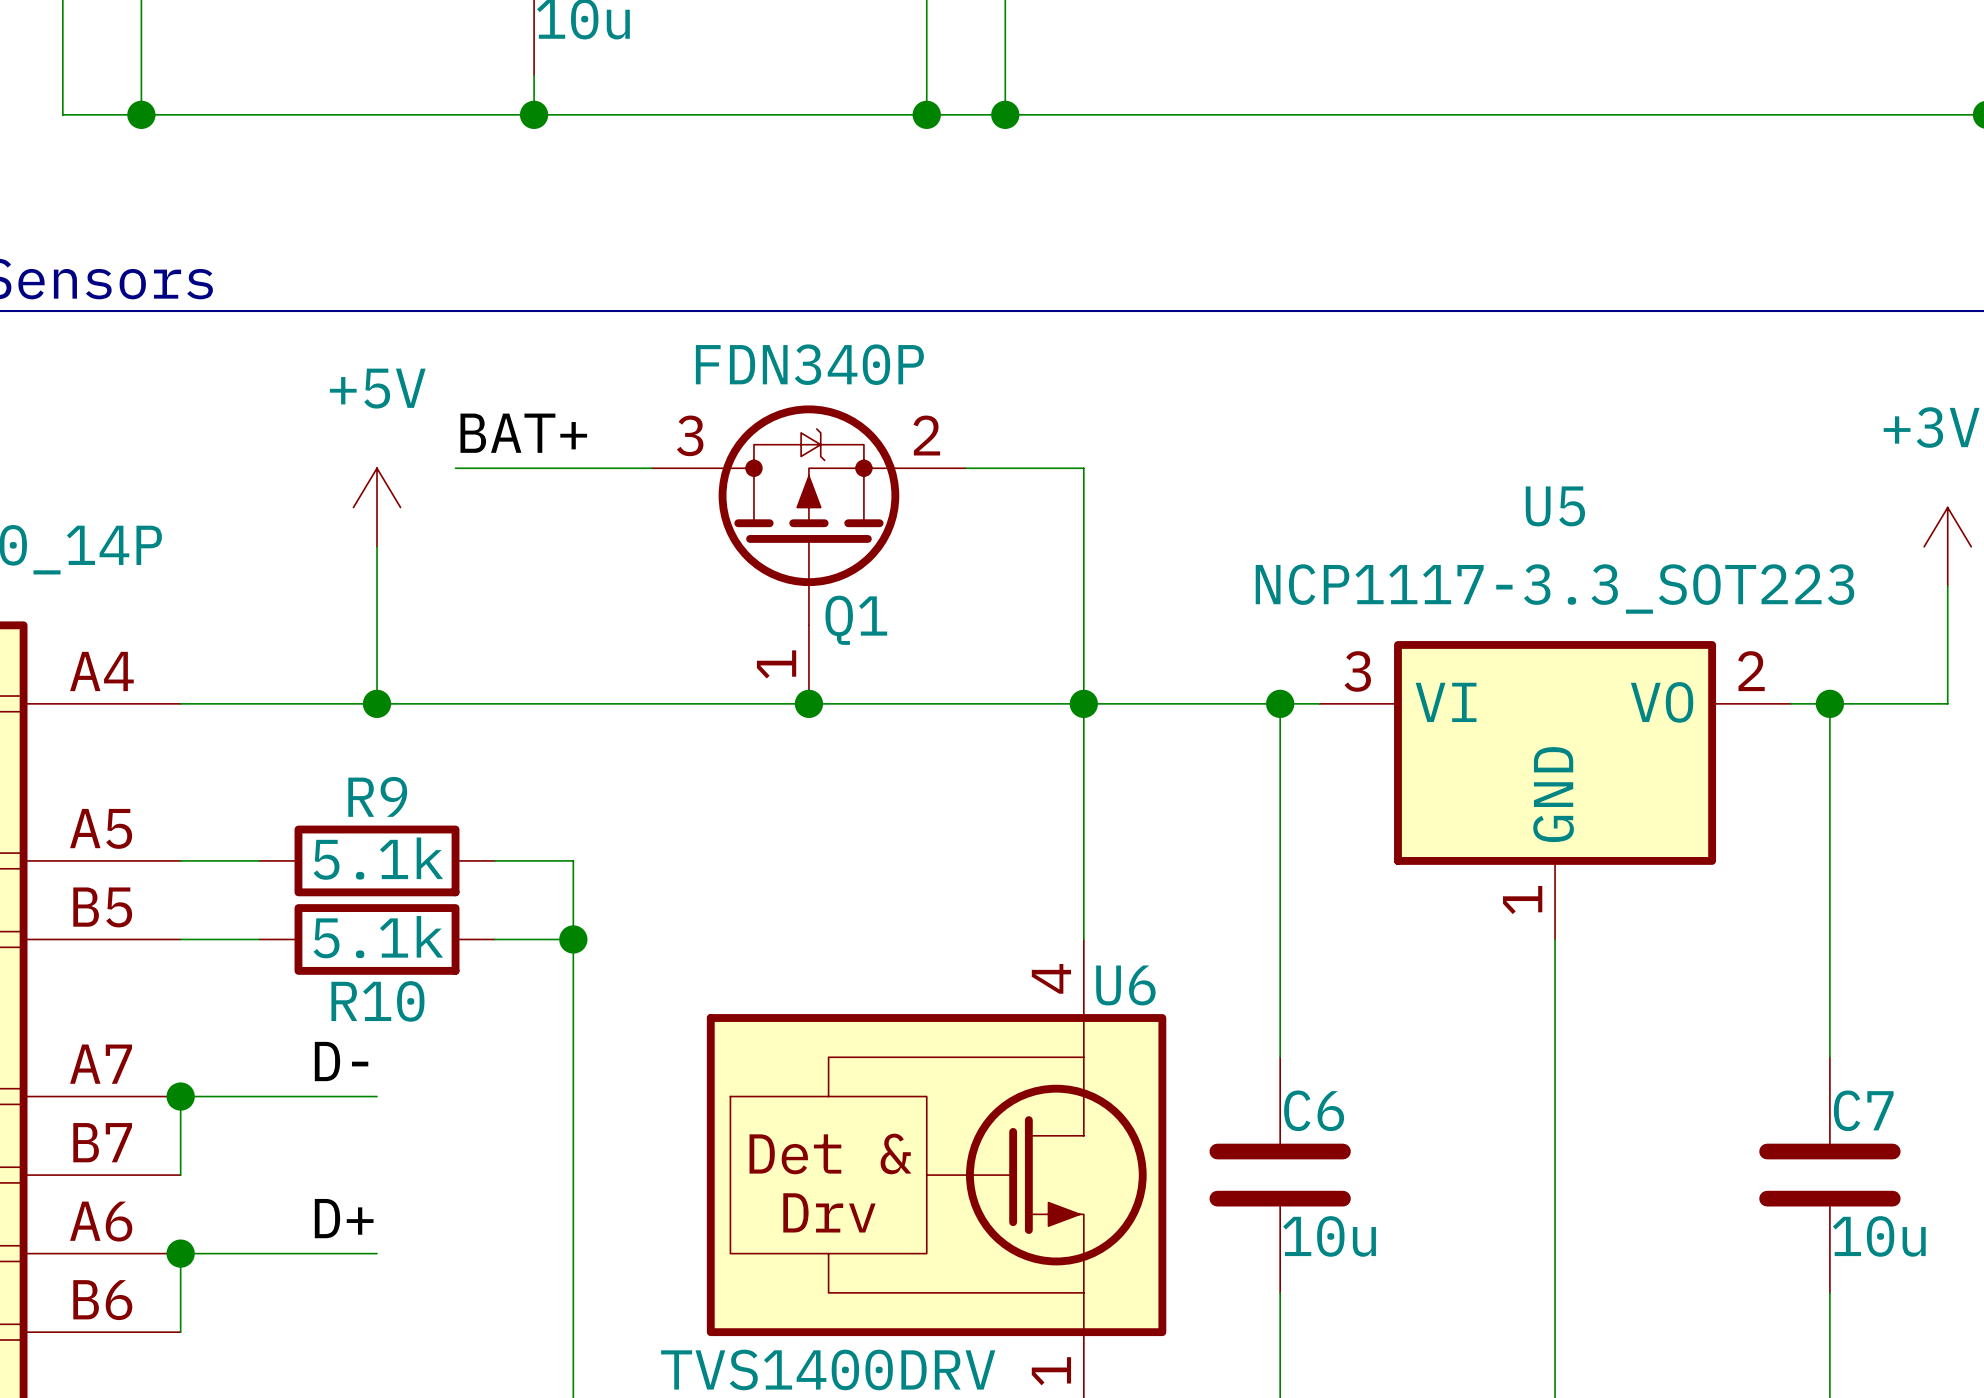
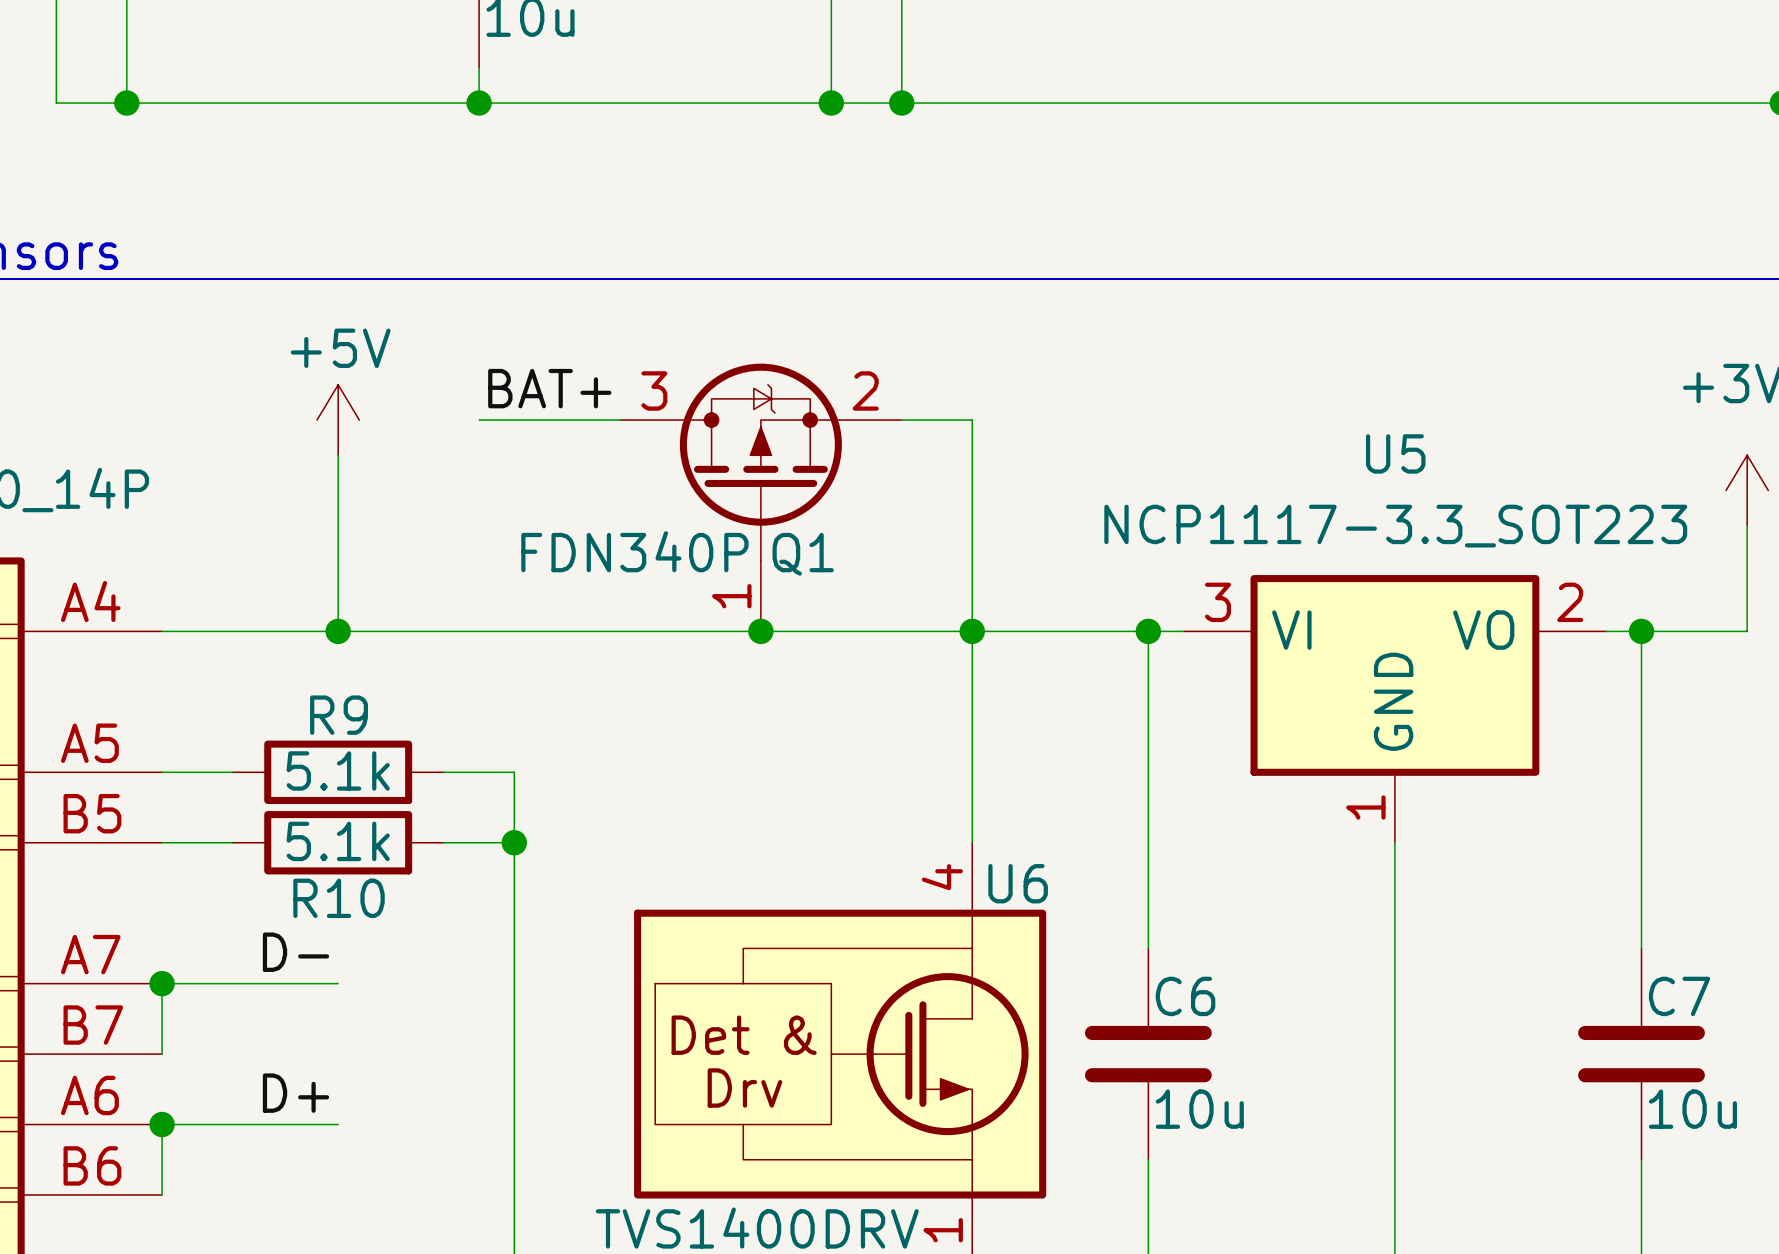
Q1 value position: FDN340P (809, 364) -> FDN340P (634, 551)
label position: BAT+ (523, 433) -> BAT+ (549, 388)
wire: (455, 468) (534, 468) -> none
power symbol position: +5V (377, 507) -> +5V (338, 420)
Q1 position: (808, 554) -> (760, 497)
junction position: (808, 703) -> (760, 631)

